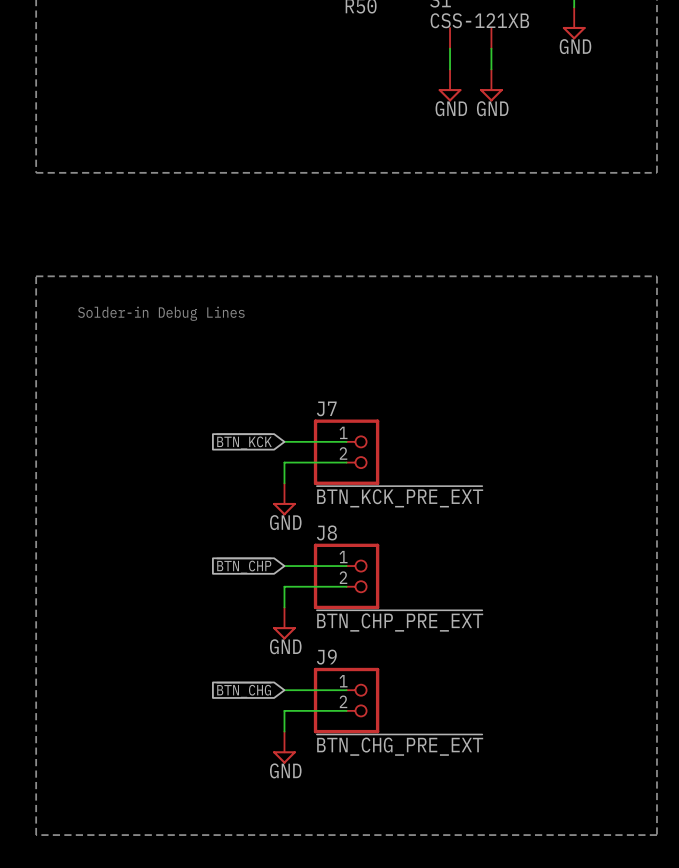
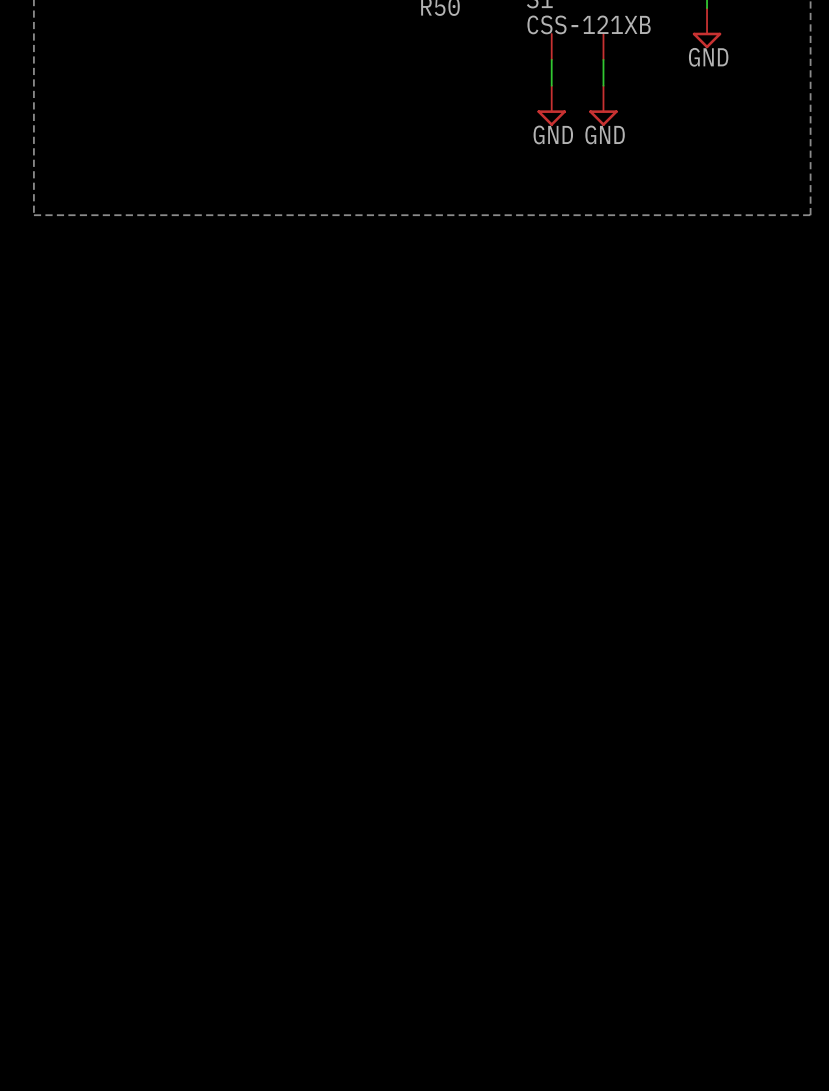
line: (36, 276) (656, 276) (656, 835) (36, 835) (36, 276) -> none
text: Solder-in Debug Lines (161, 313) -> none
global label: ~{BTN_KCK} (244, 441) -> none
wire: (284, 441) (346, 441) -> none
J7: ~{BTN_KCK_PRE_EXT} (346, 452) -> none
wire: (346, 462) (284, 462) (284, 483) -> none
power symbol: GND (284, 499) -> none
global label: ~{BTN_CHP} (244, 566) -> none
wire: (284, 566) (346, 566) -> none
J8: ~{BTN_CHP_PRE_EXT} (346, 576) -> none
wire: (346, 586) (284, 586) (284, 607) -> none
power symbol: GND (284, 623) -> none
global label: ~{BTN_CHG} (244, 690) -> none
wire: (284, 690) (346, 690) -> none
J9: ~{BTN_CHG_PRE_EXT} (346, 700) -> none
wire: (346, 710) (284, 710) (284, 731) -> none
power symbol: GND (284, 747) -> none

